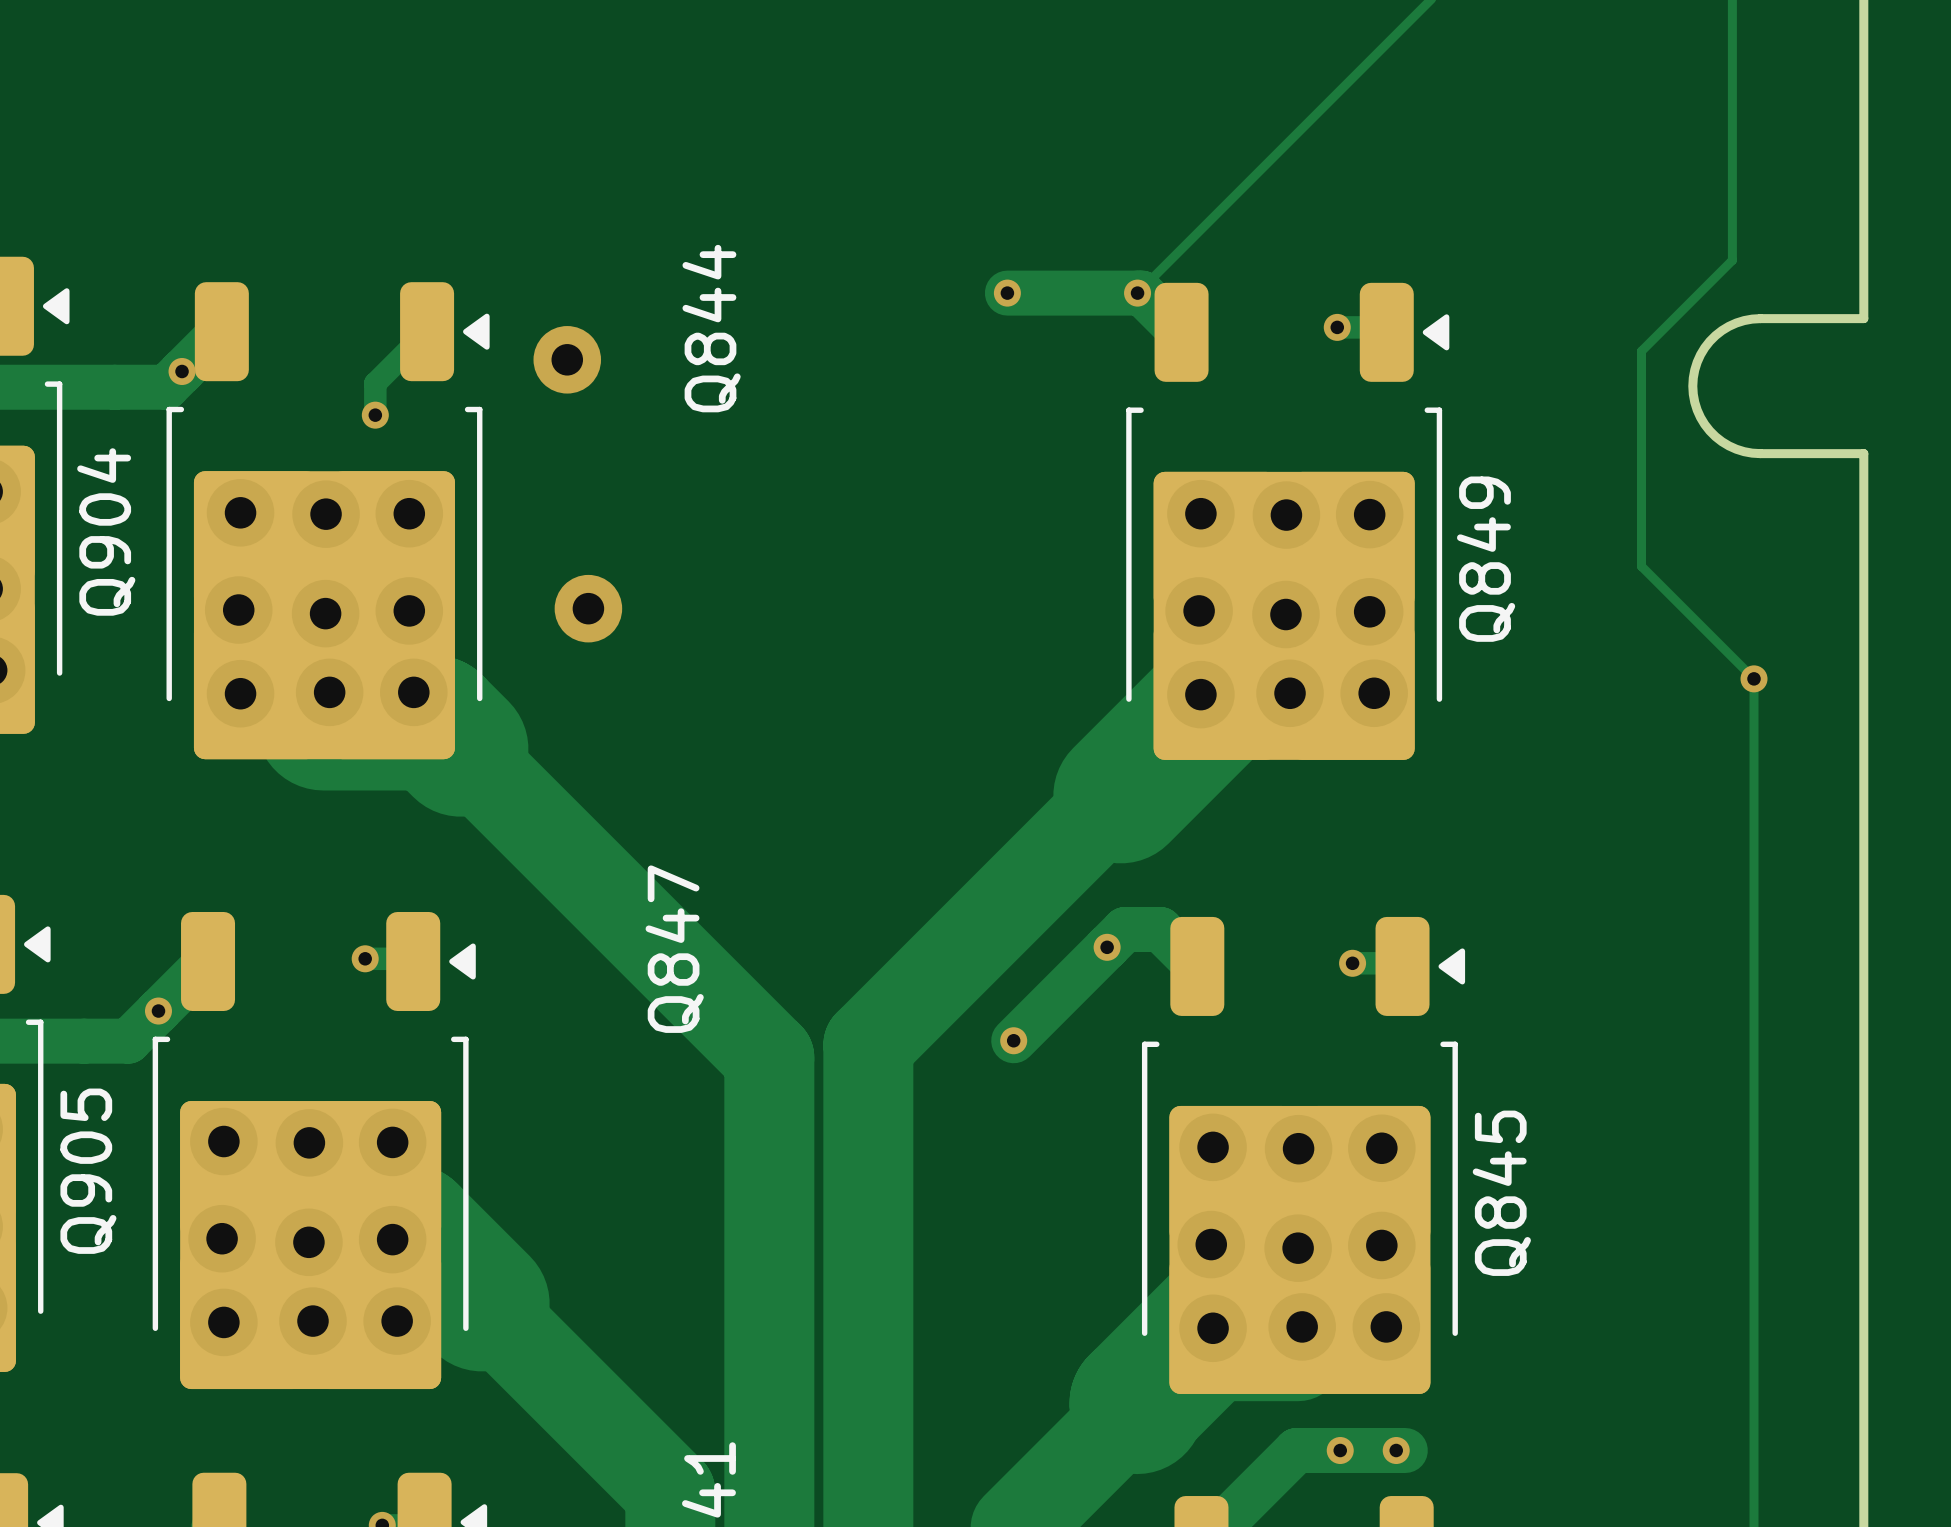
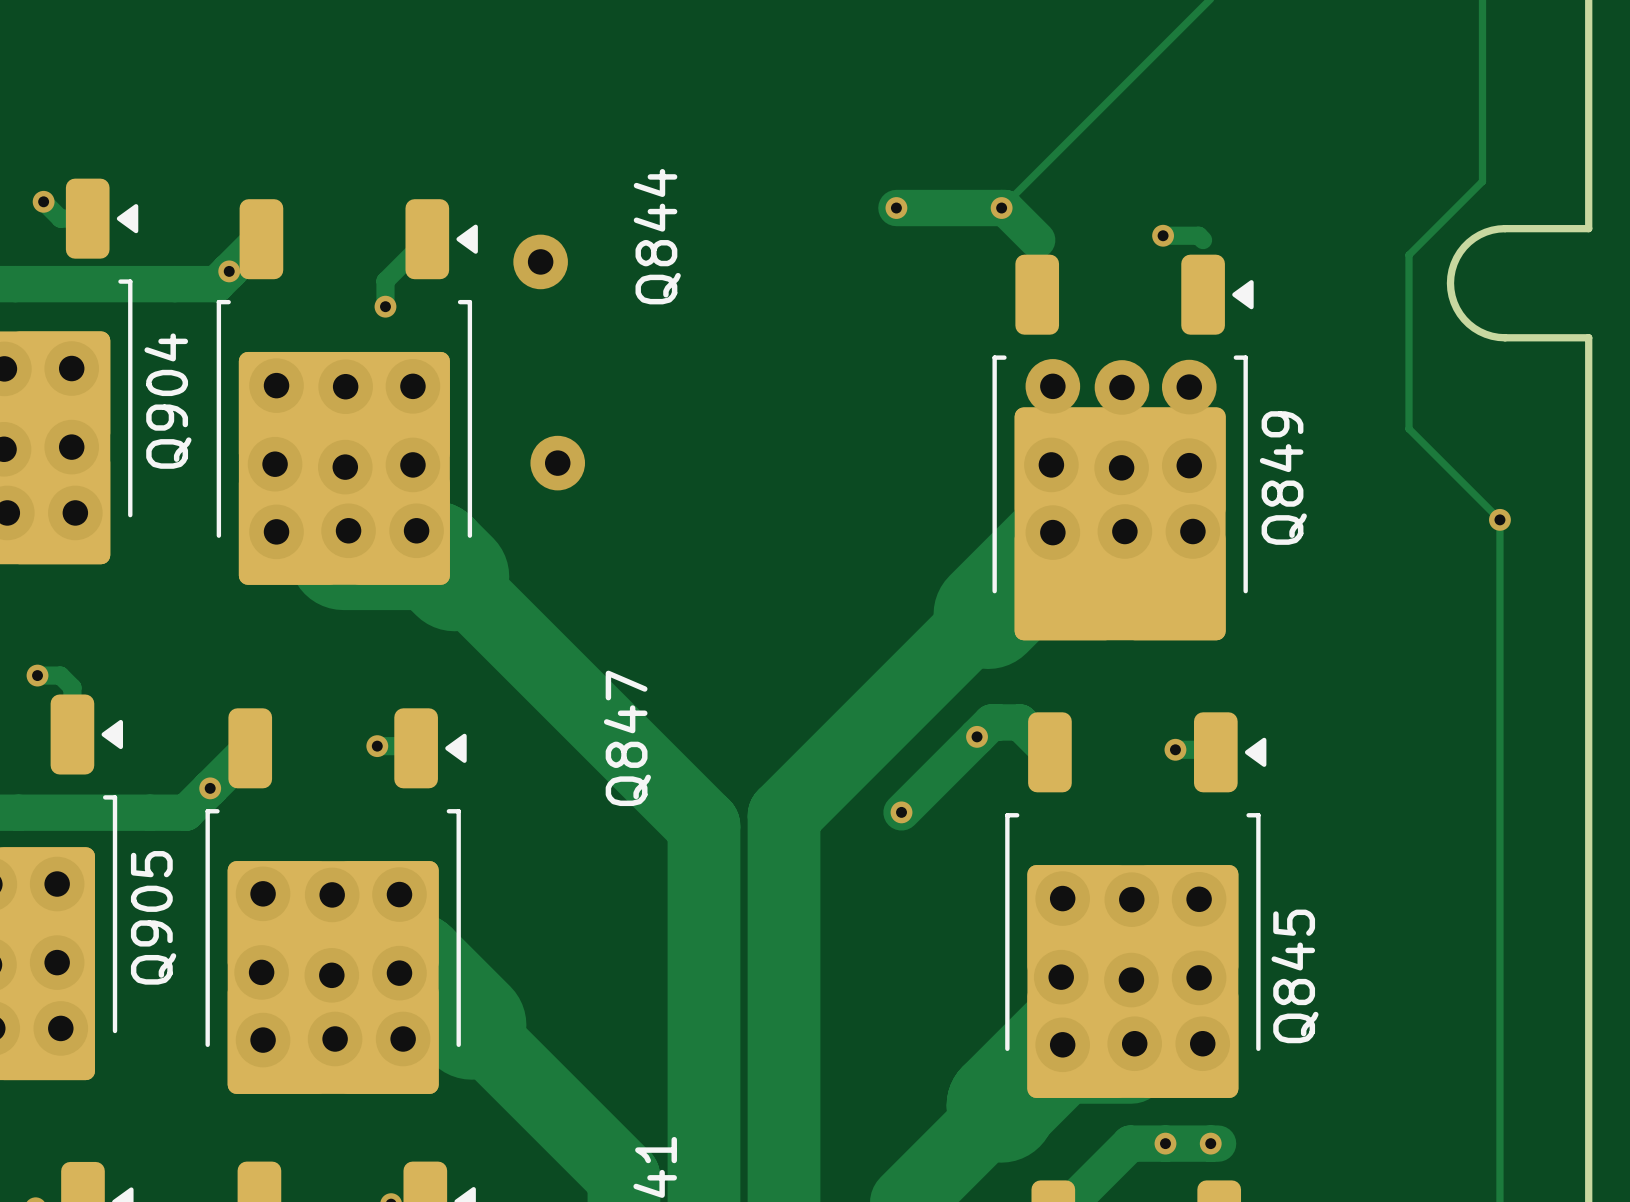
Q849 position: (1287, 521) -> (1123, 447)
Q845 name position: Q845 (1501, 1193) -> Q845 (1295, 976)

